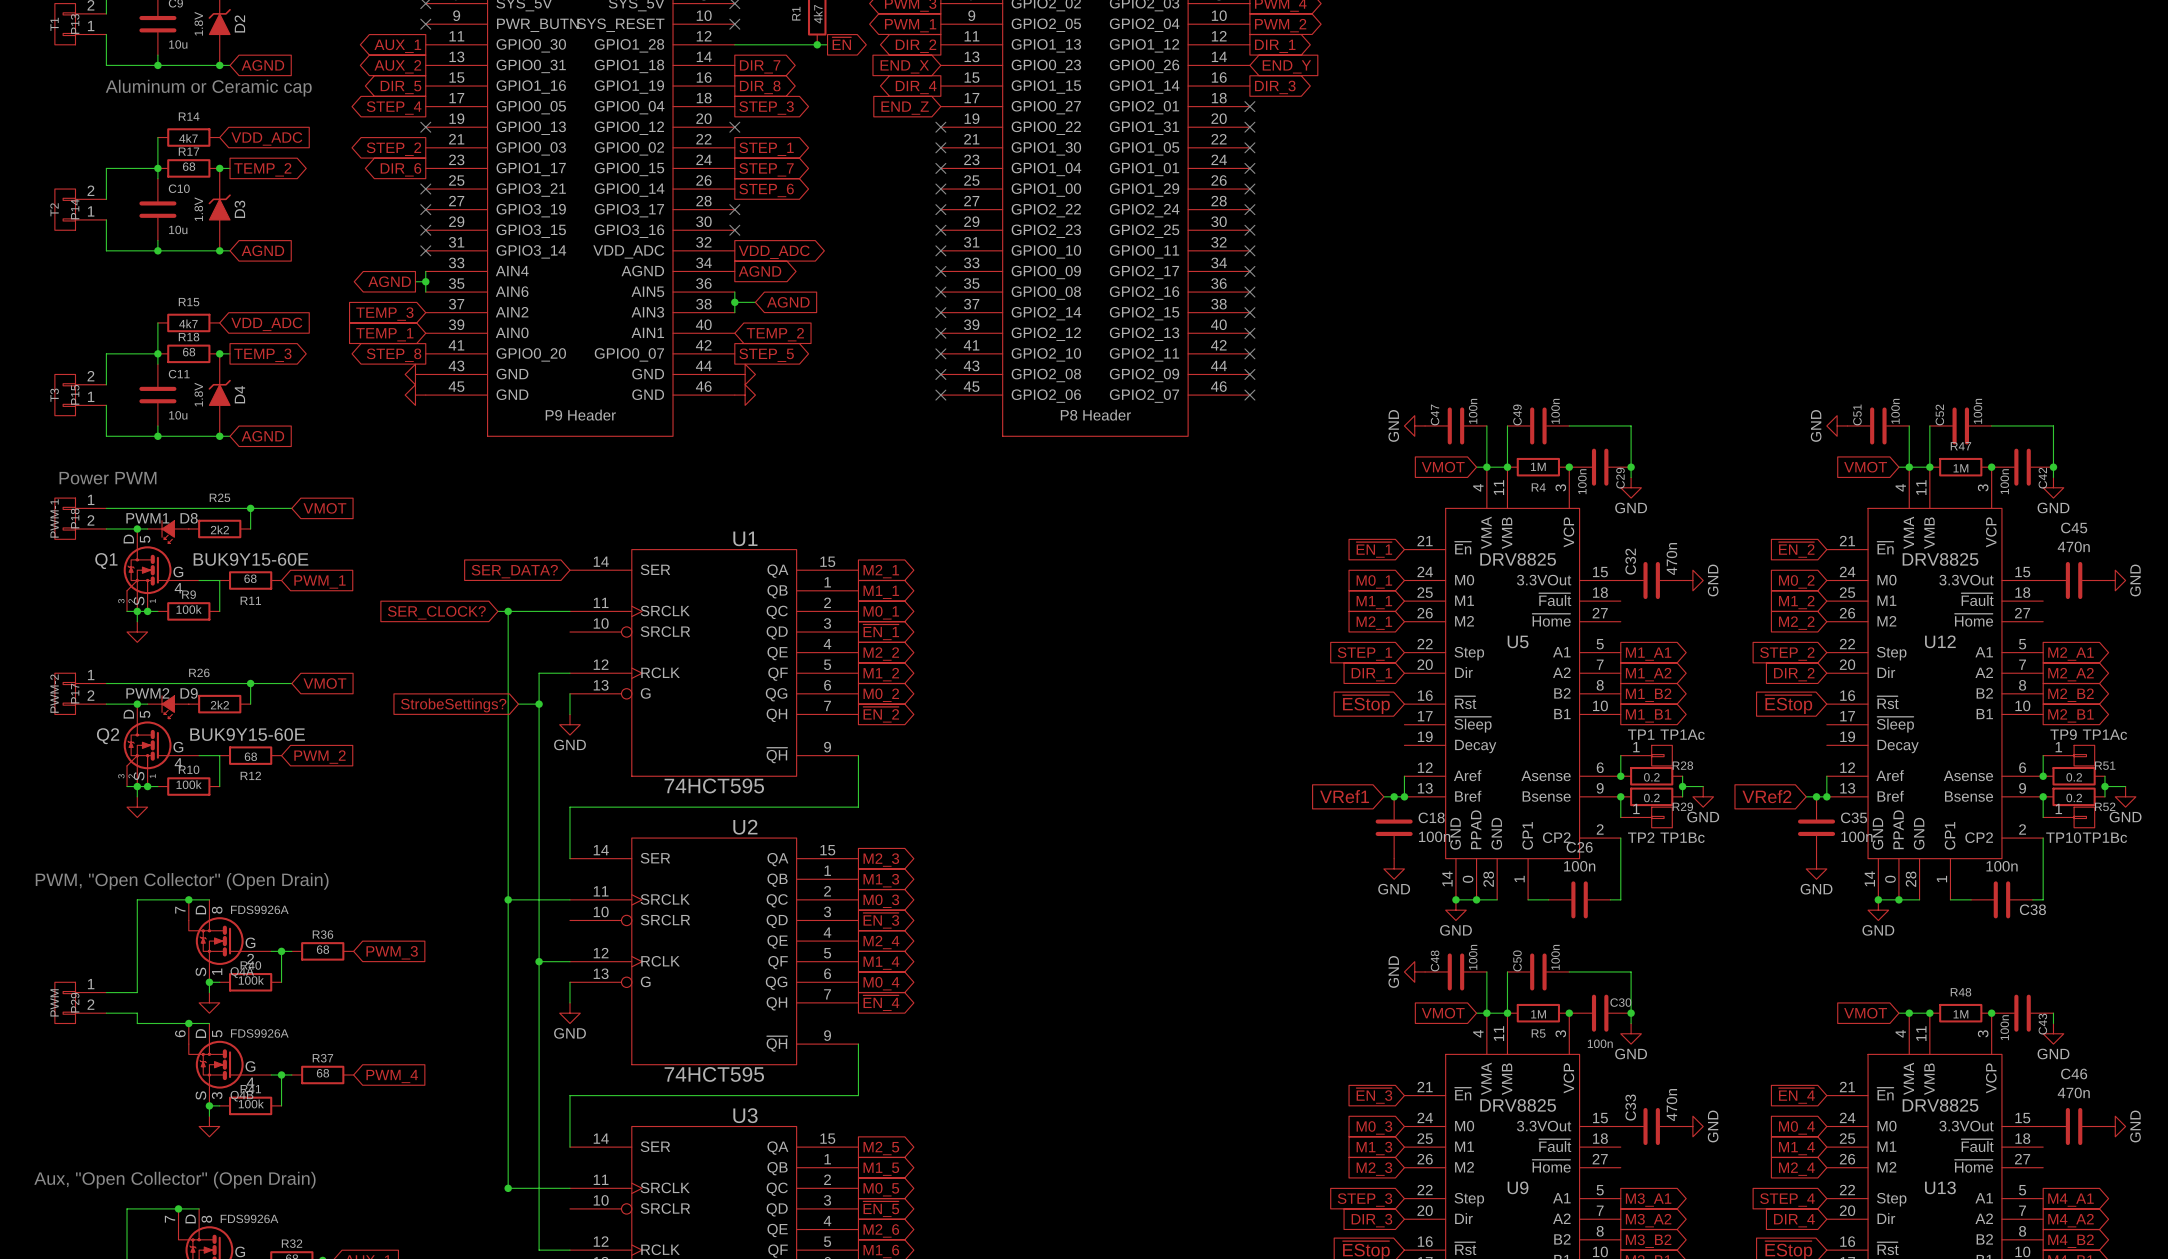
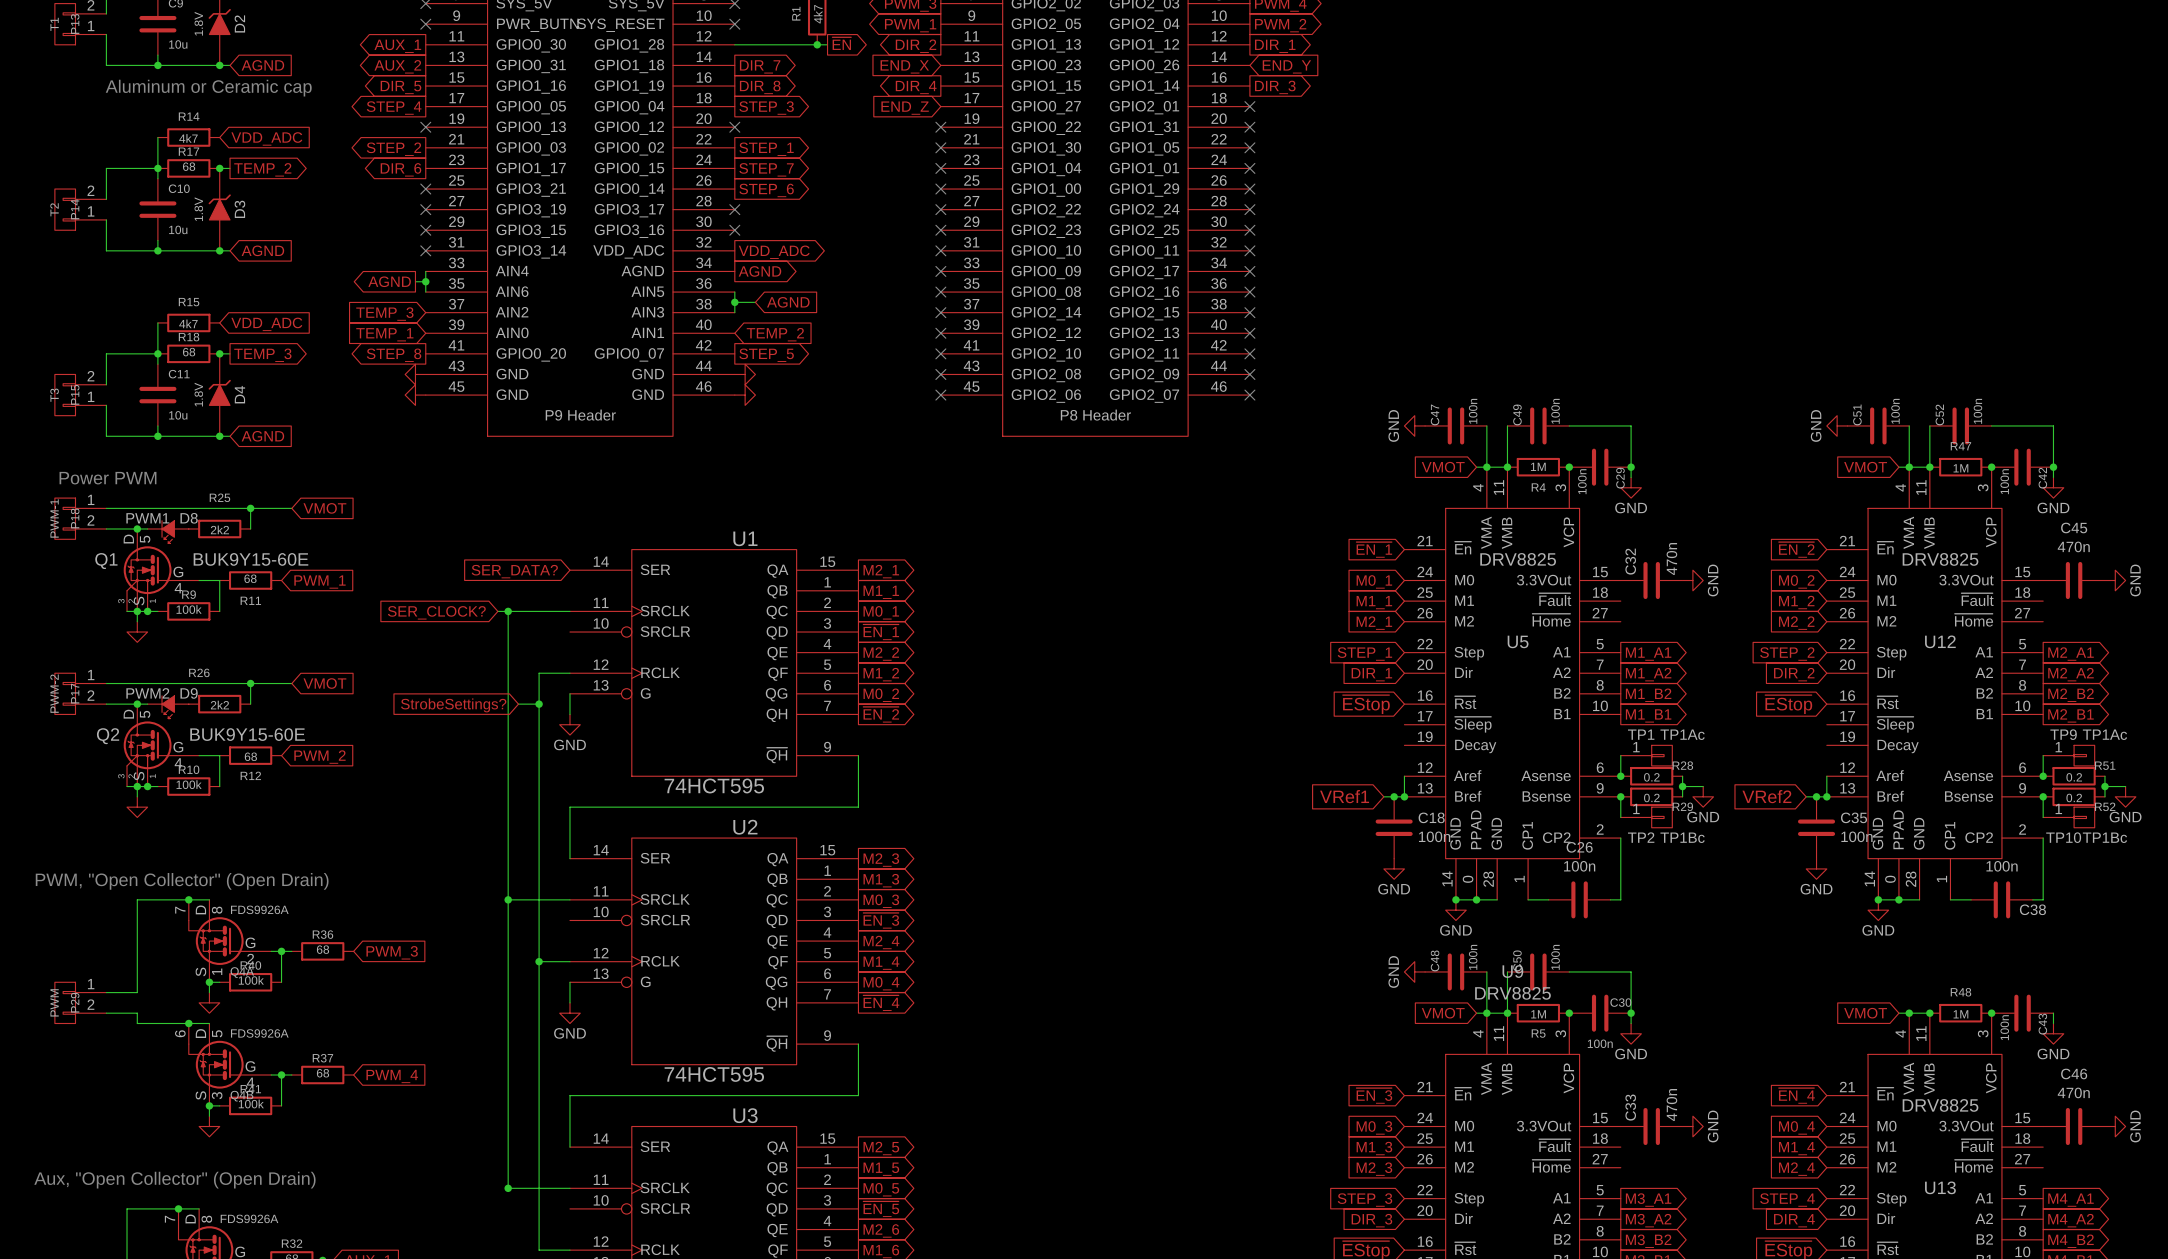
U9 value position: DRV8825 (1518, 1105) -> DRV8825 (1512, 993)
U9 name position: U9 (1518, 1187) -> U9 (1512, 971)

